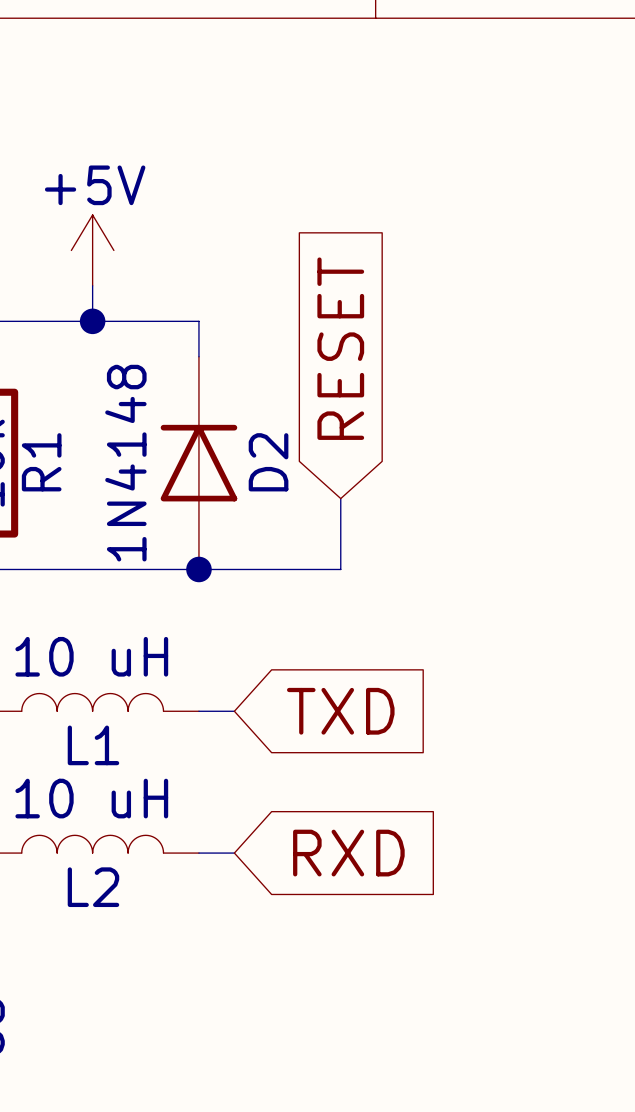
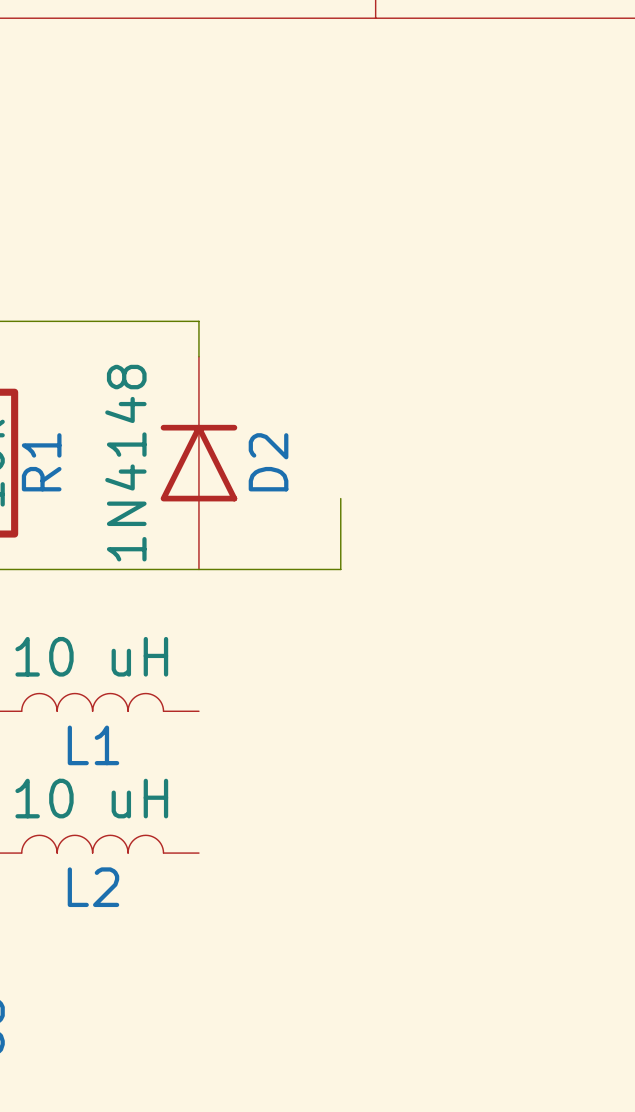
power symbol: +5V (92, 250) -> none
wire: (92, 285) (92, 321) -> none
junction: (92, 321) -> none
global label: RESET (340, 348) -> none
junction: (198, 569) -> none
wire: (198, 711) (234, 711) -> none
global label: TXD (340, 711) -> none
wire: (198, 853) (234, 853) -> none
global label: RXD (348, 853) -> none

